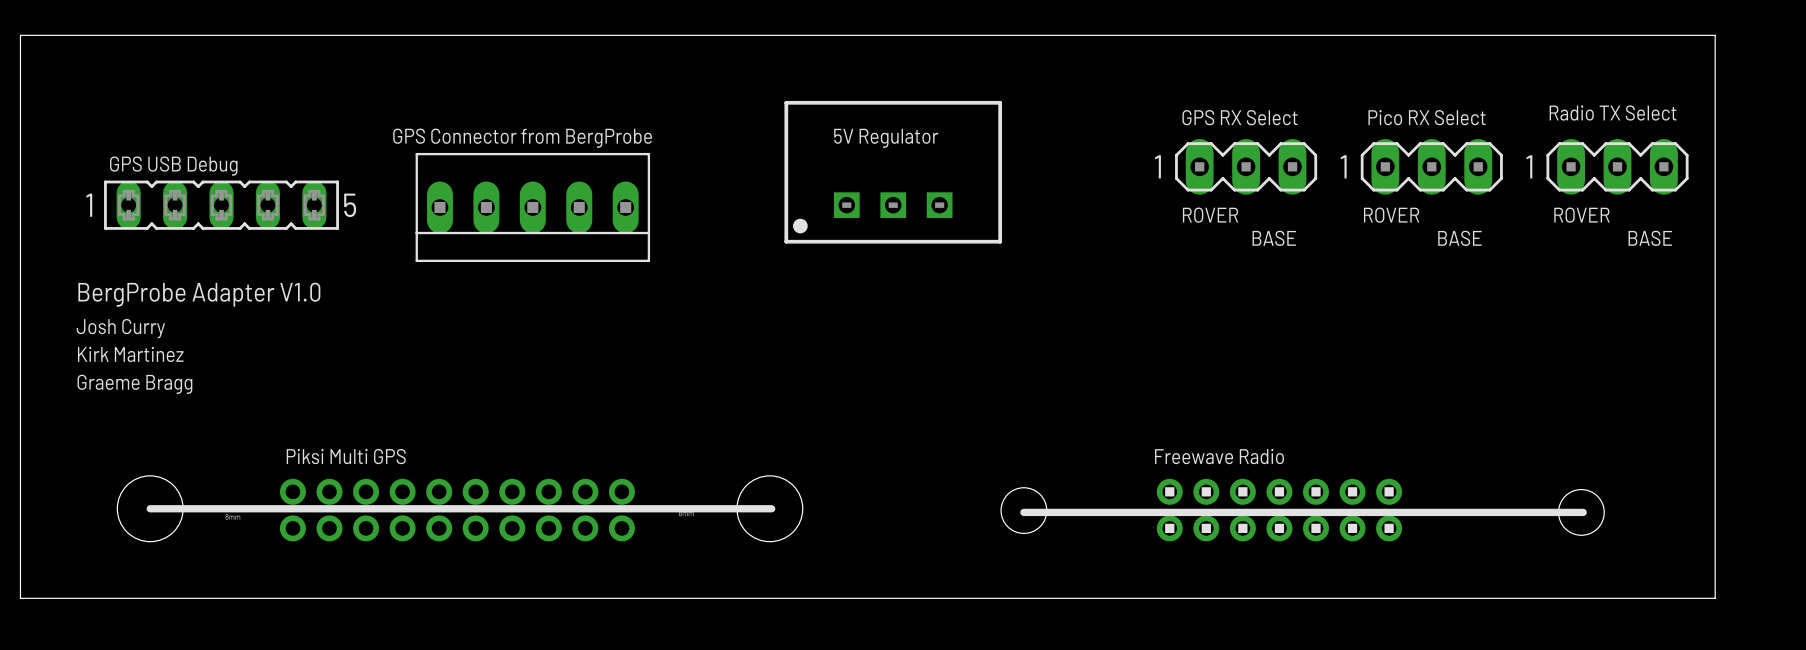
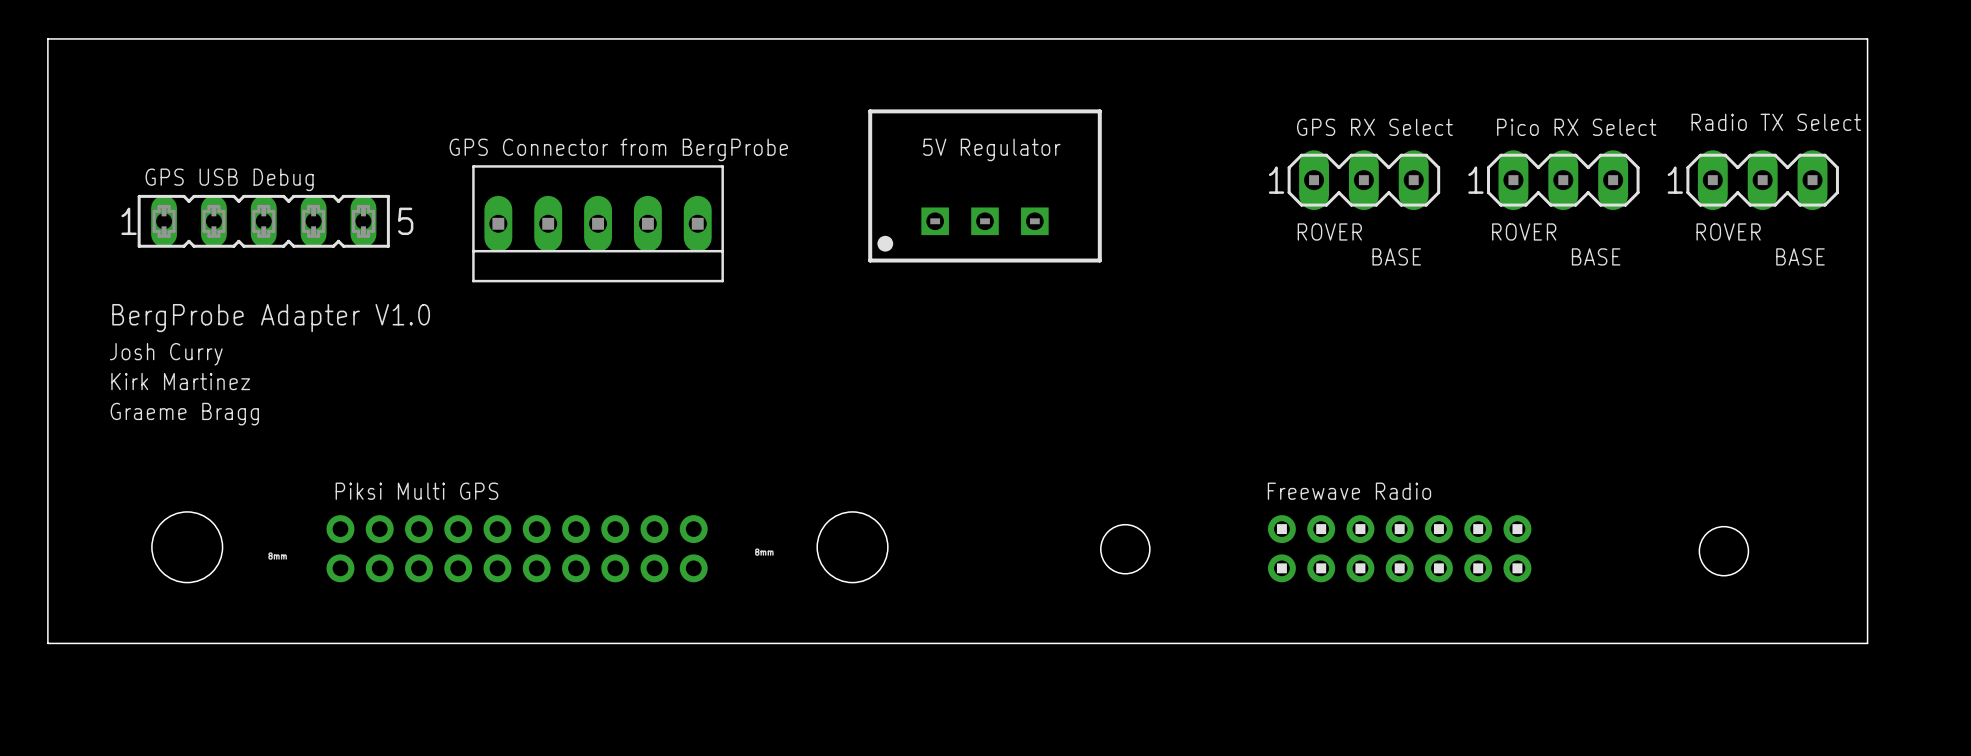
line: (150, 508) (771, 508) -> none
line: (1023, 512) (1583, 512) -> none

